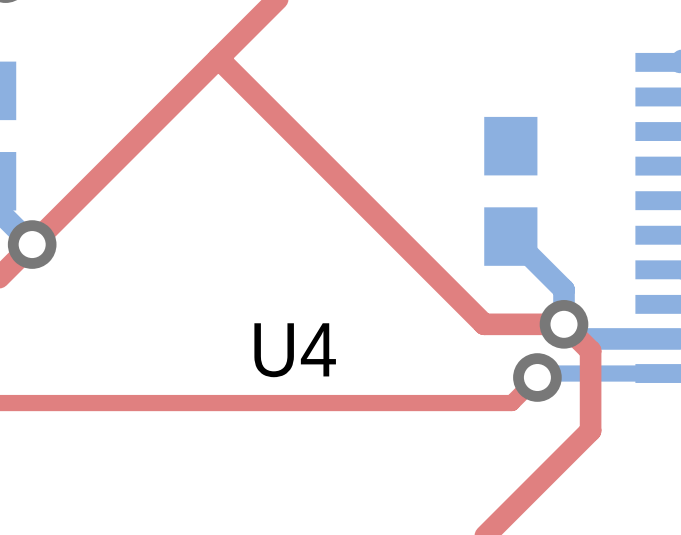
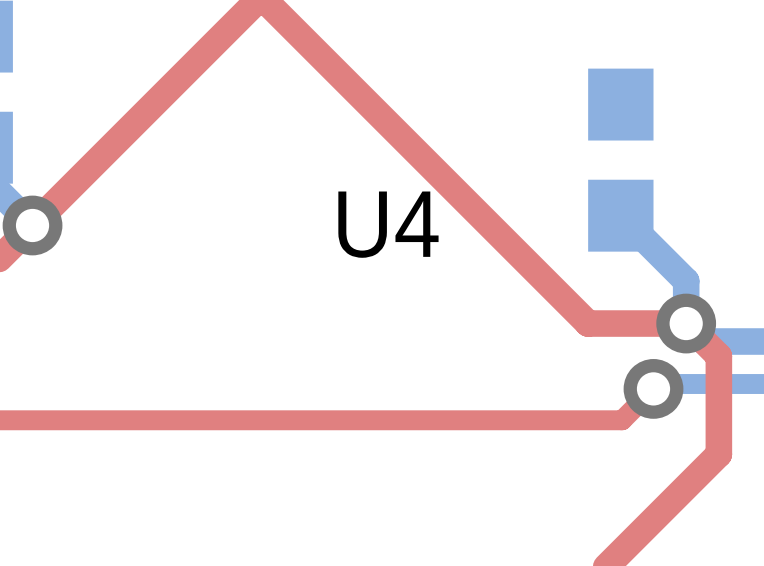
U4 name position: U4 (295, 350) -> U4 (388, 224)

